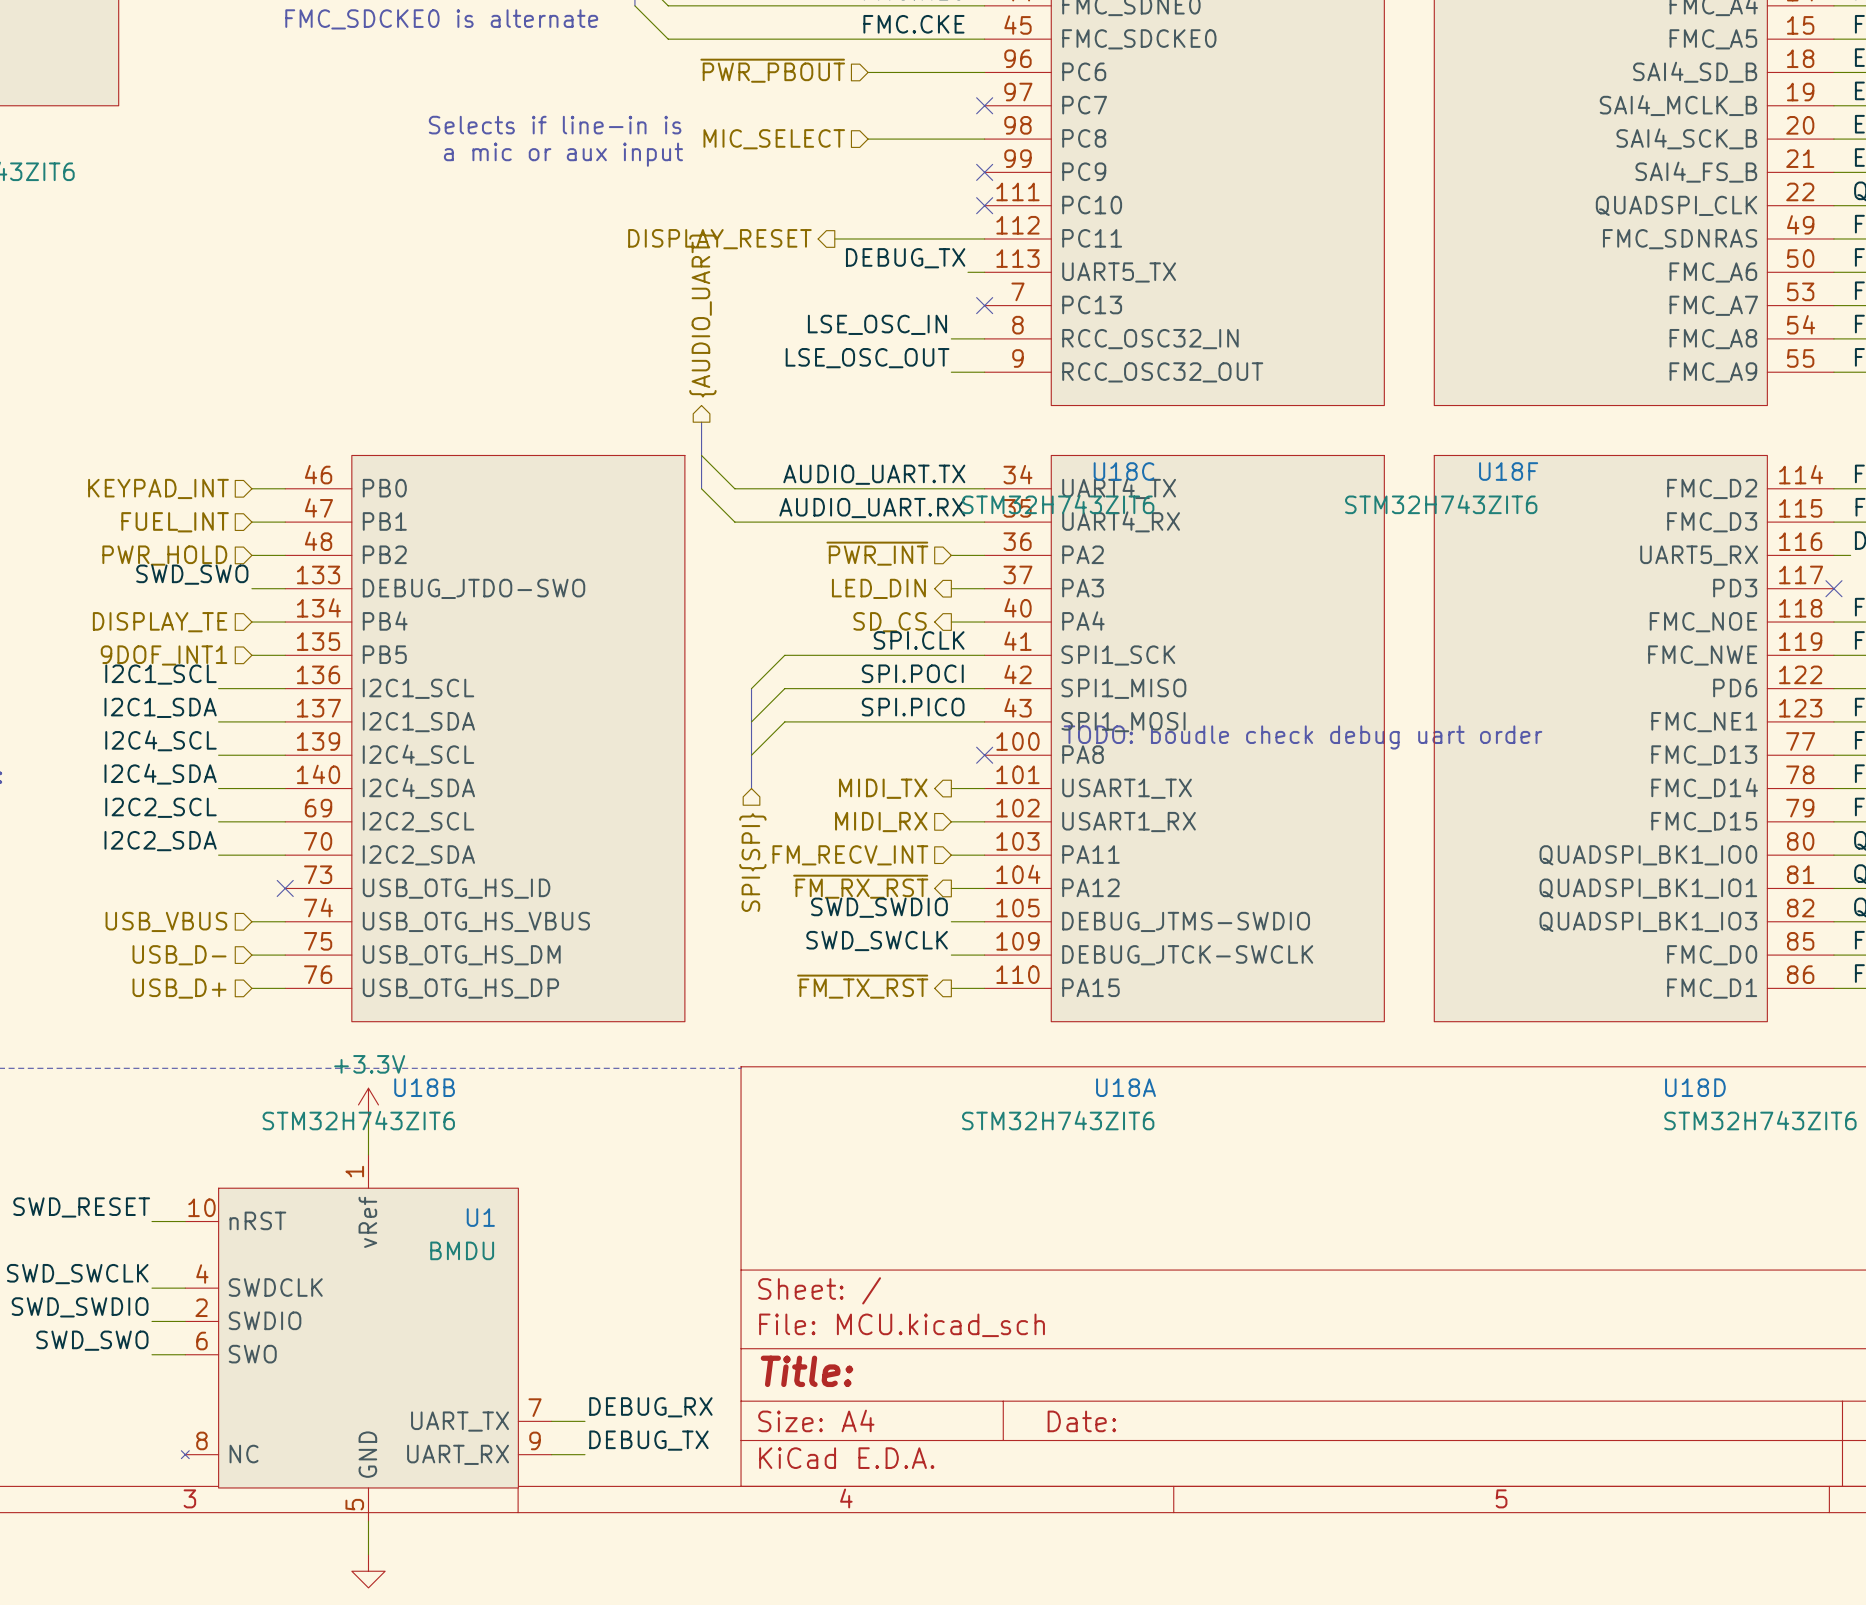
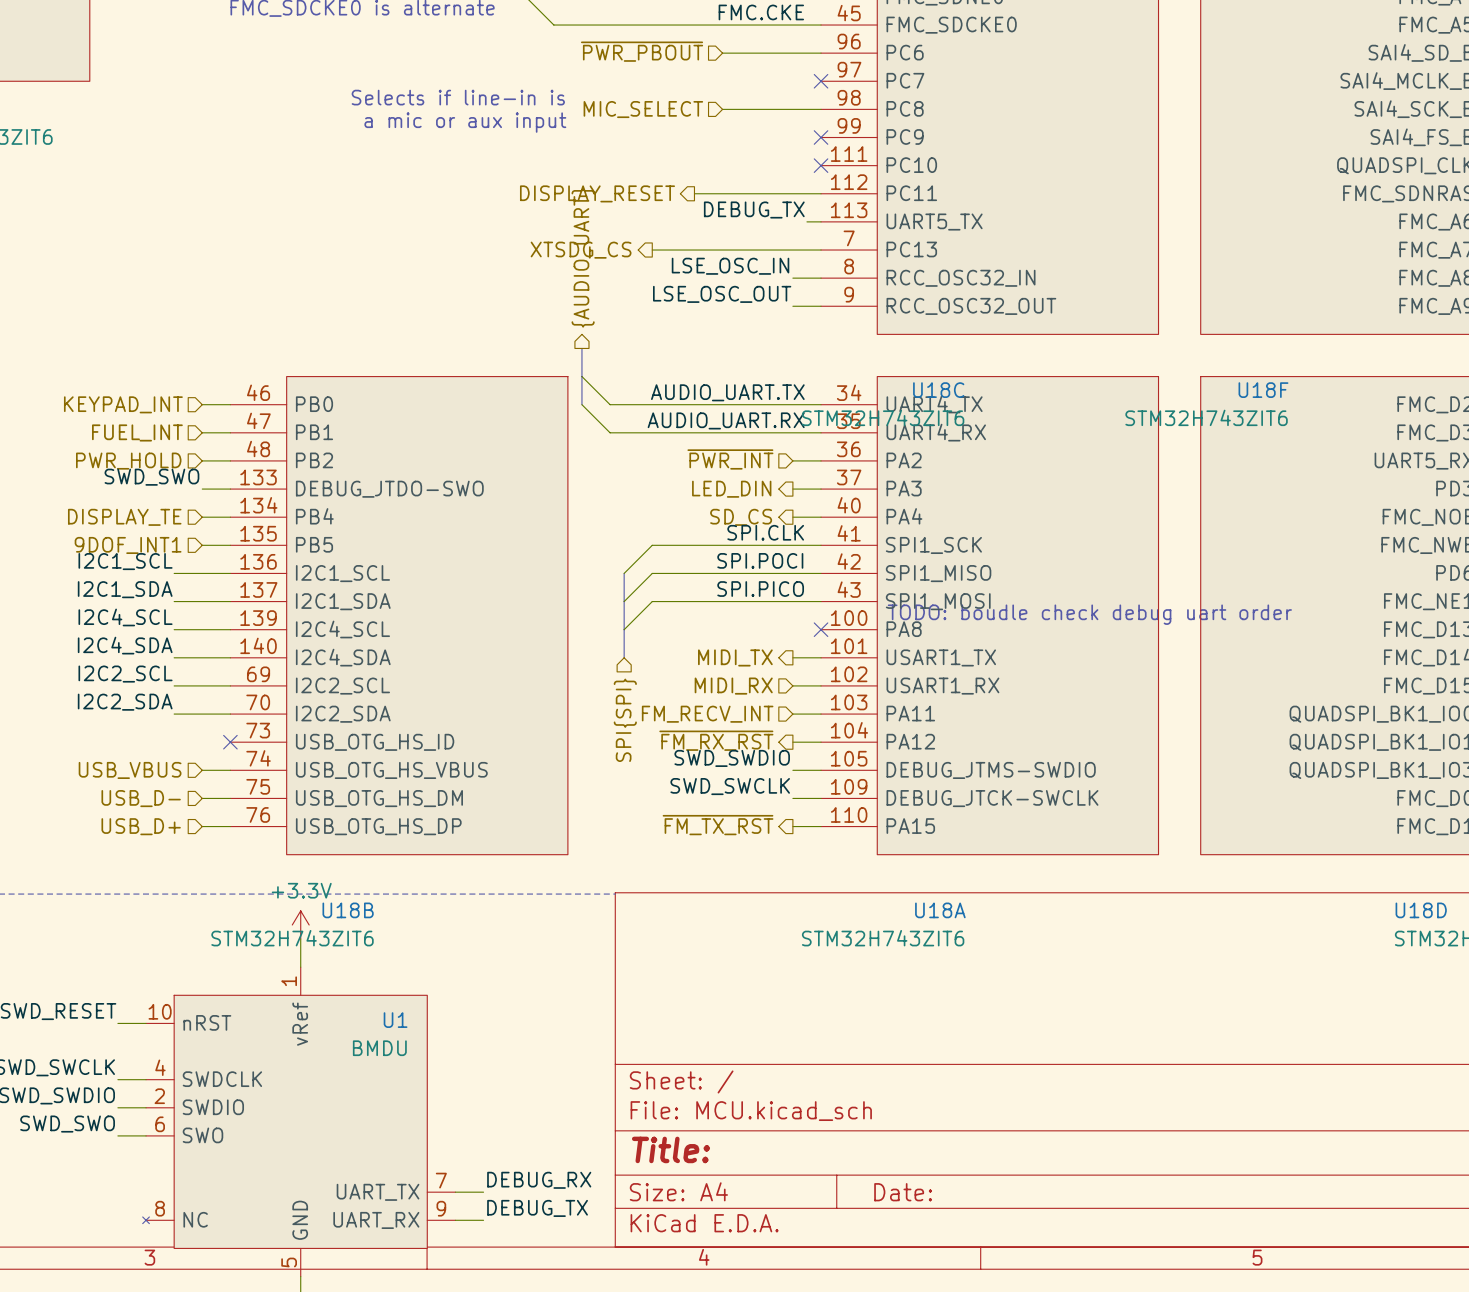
hierarchical label: none -> XTSDG_CS (581, 250)
wire: none -> (652, 250) (821, 250)
no-connect mark: (984, 305) -> none

